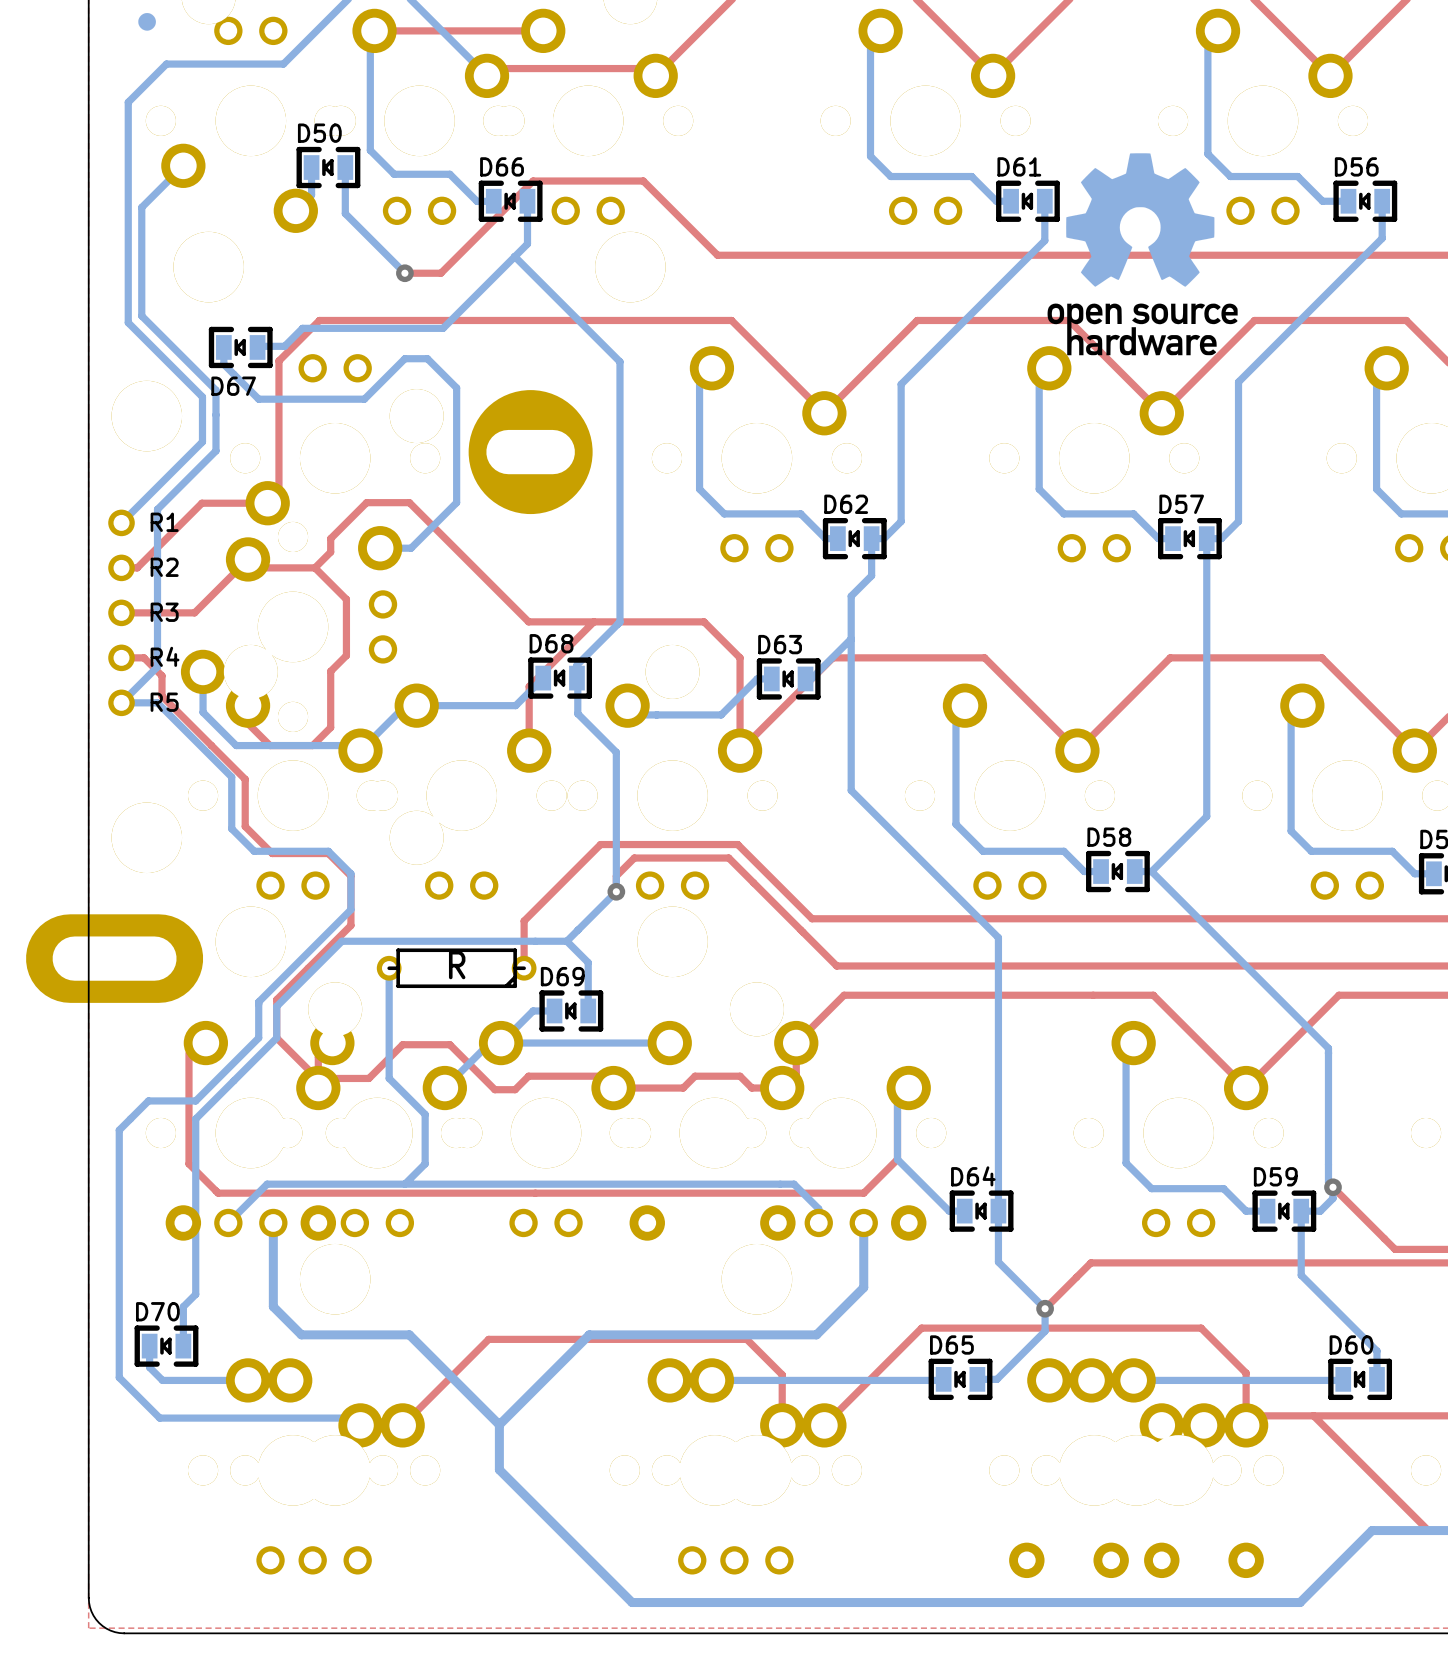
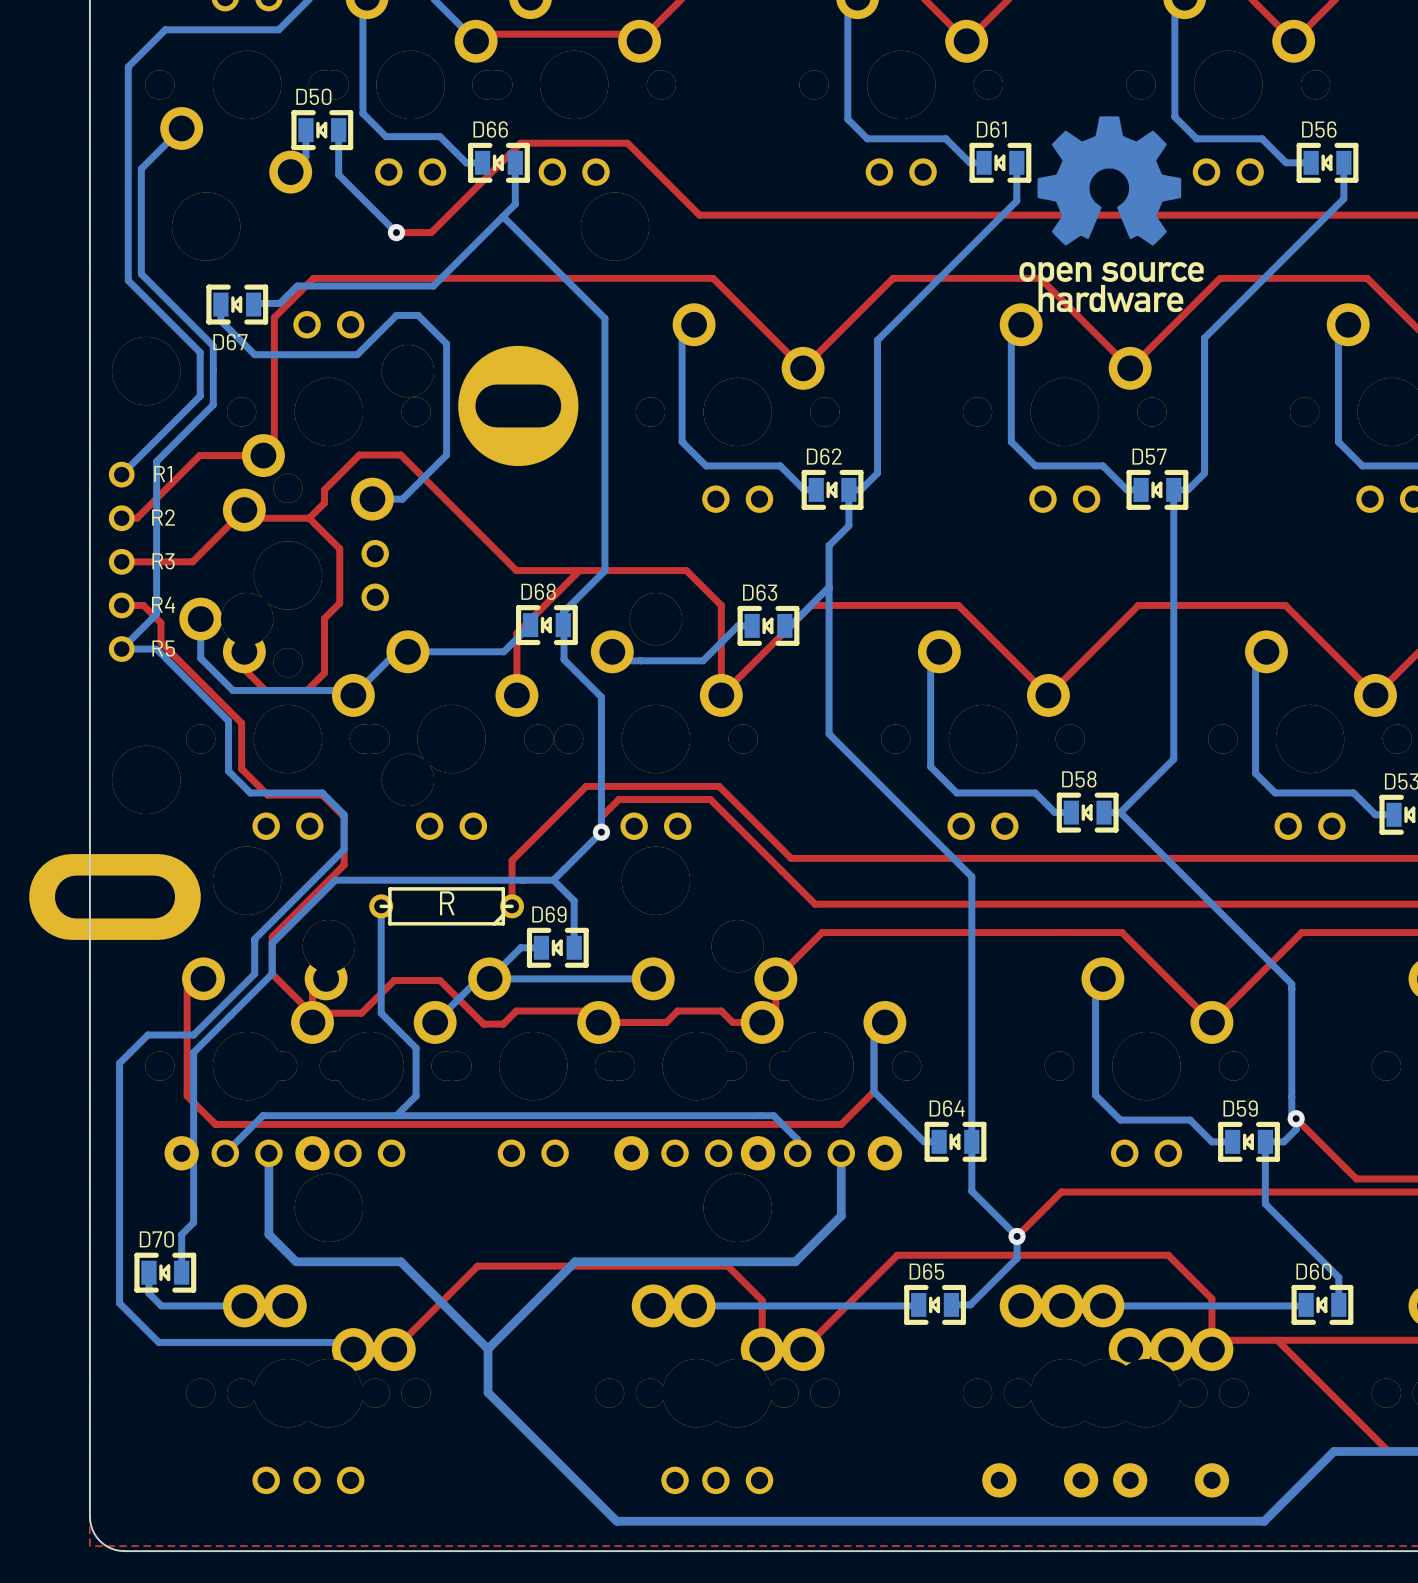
part: none -> (696, 1153)

